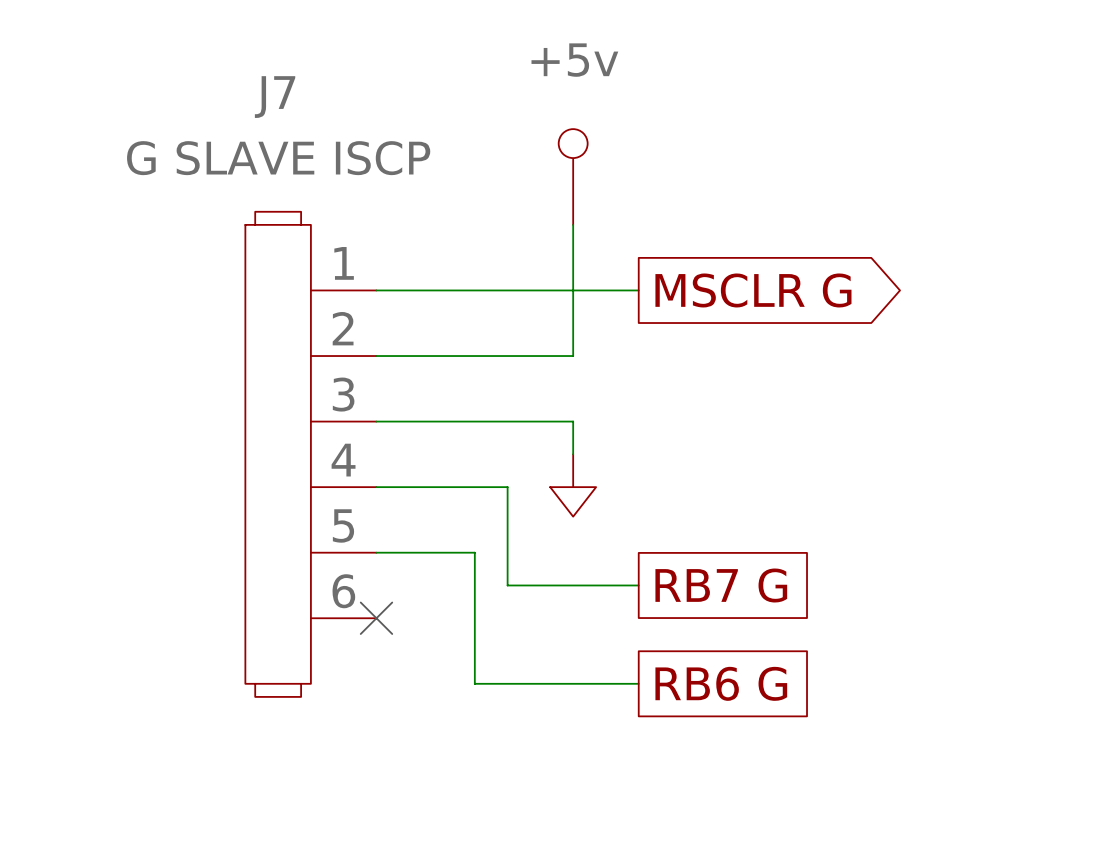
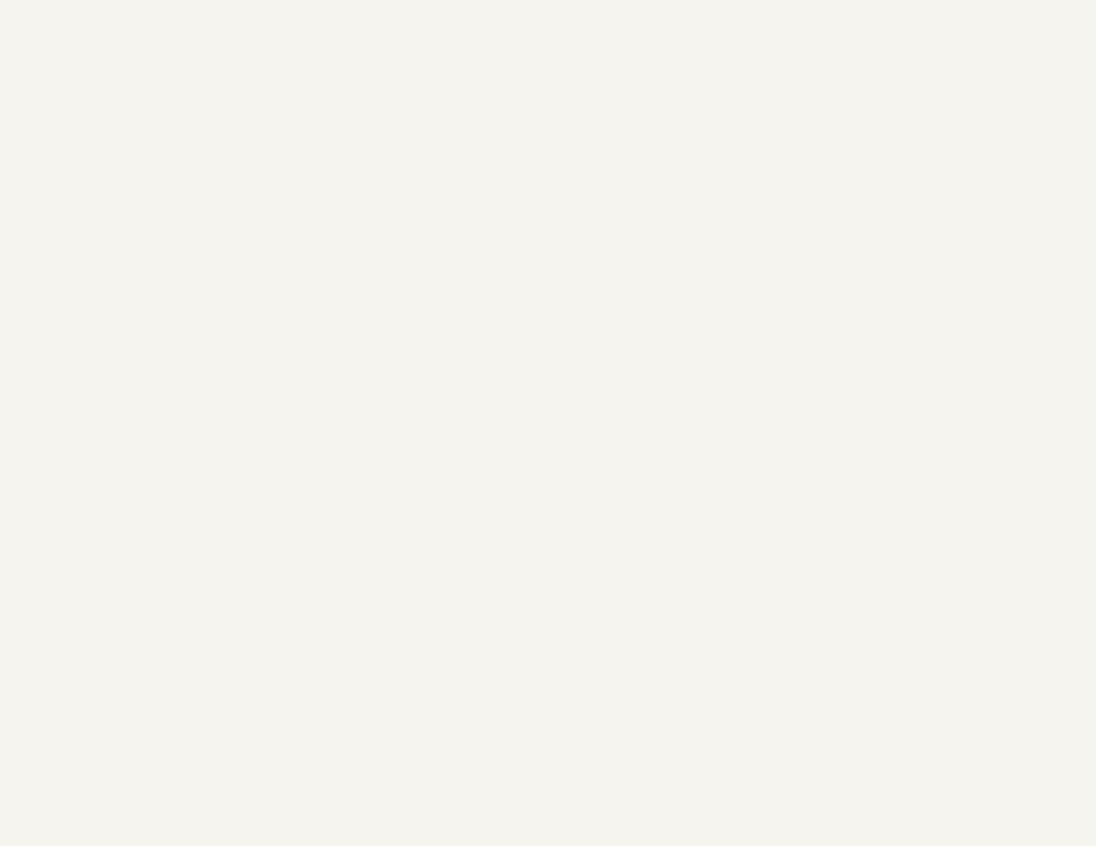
power symbol: +5v (573, 177) -> none
wire: (573, 224) (573, 356) (376, 356) -> none
wire: (376, 290) (638, 290) -> none
global label: MSCLR G (753, 290) -> none
wire: (376, 421) (573, 421) (573, 454) -> none
J7: G SLAVE ISCP (310, 454) -> none
power symbol: (573, 485) -> none
wire: (376, 487) (507, 487) (507, 585) (638, 585) -> none
wire: (376, 552) (474, 552) (474, 683) (638, 683) -> none
global label: RB7 G (721, 585) -> none
no-connect mark: (376, 618) -> none
global label: RB6 G (721, 683) -> none

